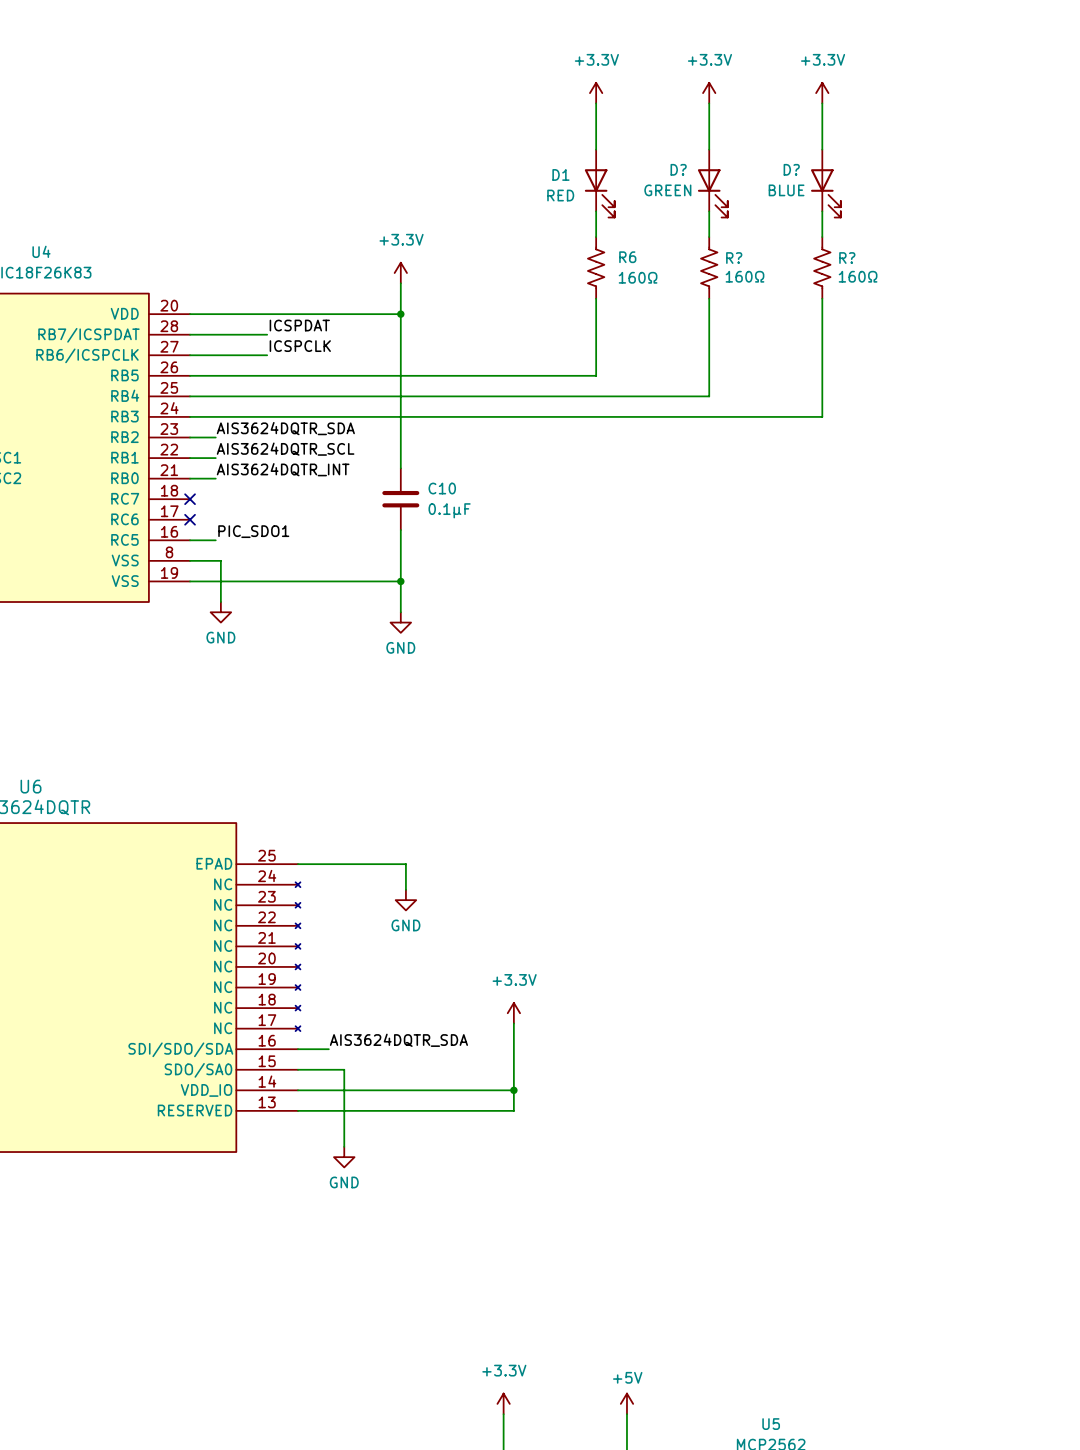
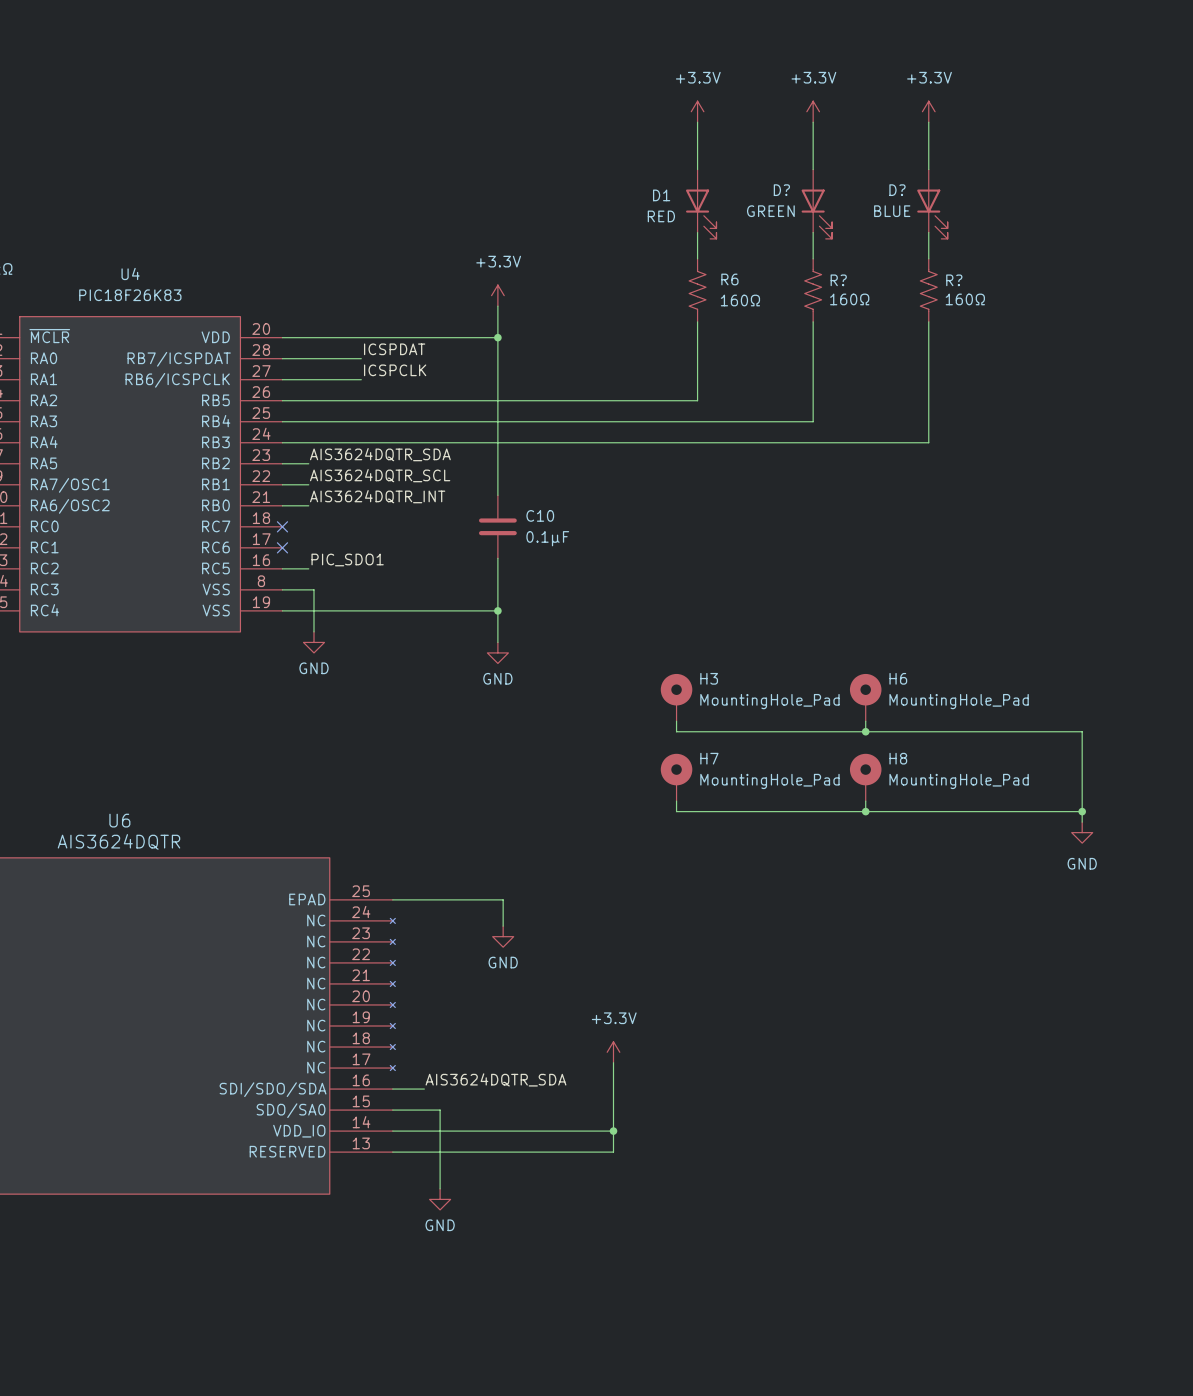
H3: none -> MountingHole_Pad (676, 697)
H6: none -> MountingHole_Pad (865, 697)
wire: none -> (676, 721) (676, 731) (1082, 731) (1082, 822)
wire: none -> (865, 721) (865, 731)
junction: none -> (865, 731)
H7: none -> MountingHole_Pad (676, 777)
H8: none -> MountingHole_Pad (865, 777)
wire: none -> (676, 801) (676, 811) (1082, 811)
wire: none -> (865, 801) (865, 811)
junction: none -> (865, 811)
junction: none -> (1082, 811)
power symbol: none -> GND (1082, 832)

